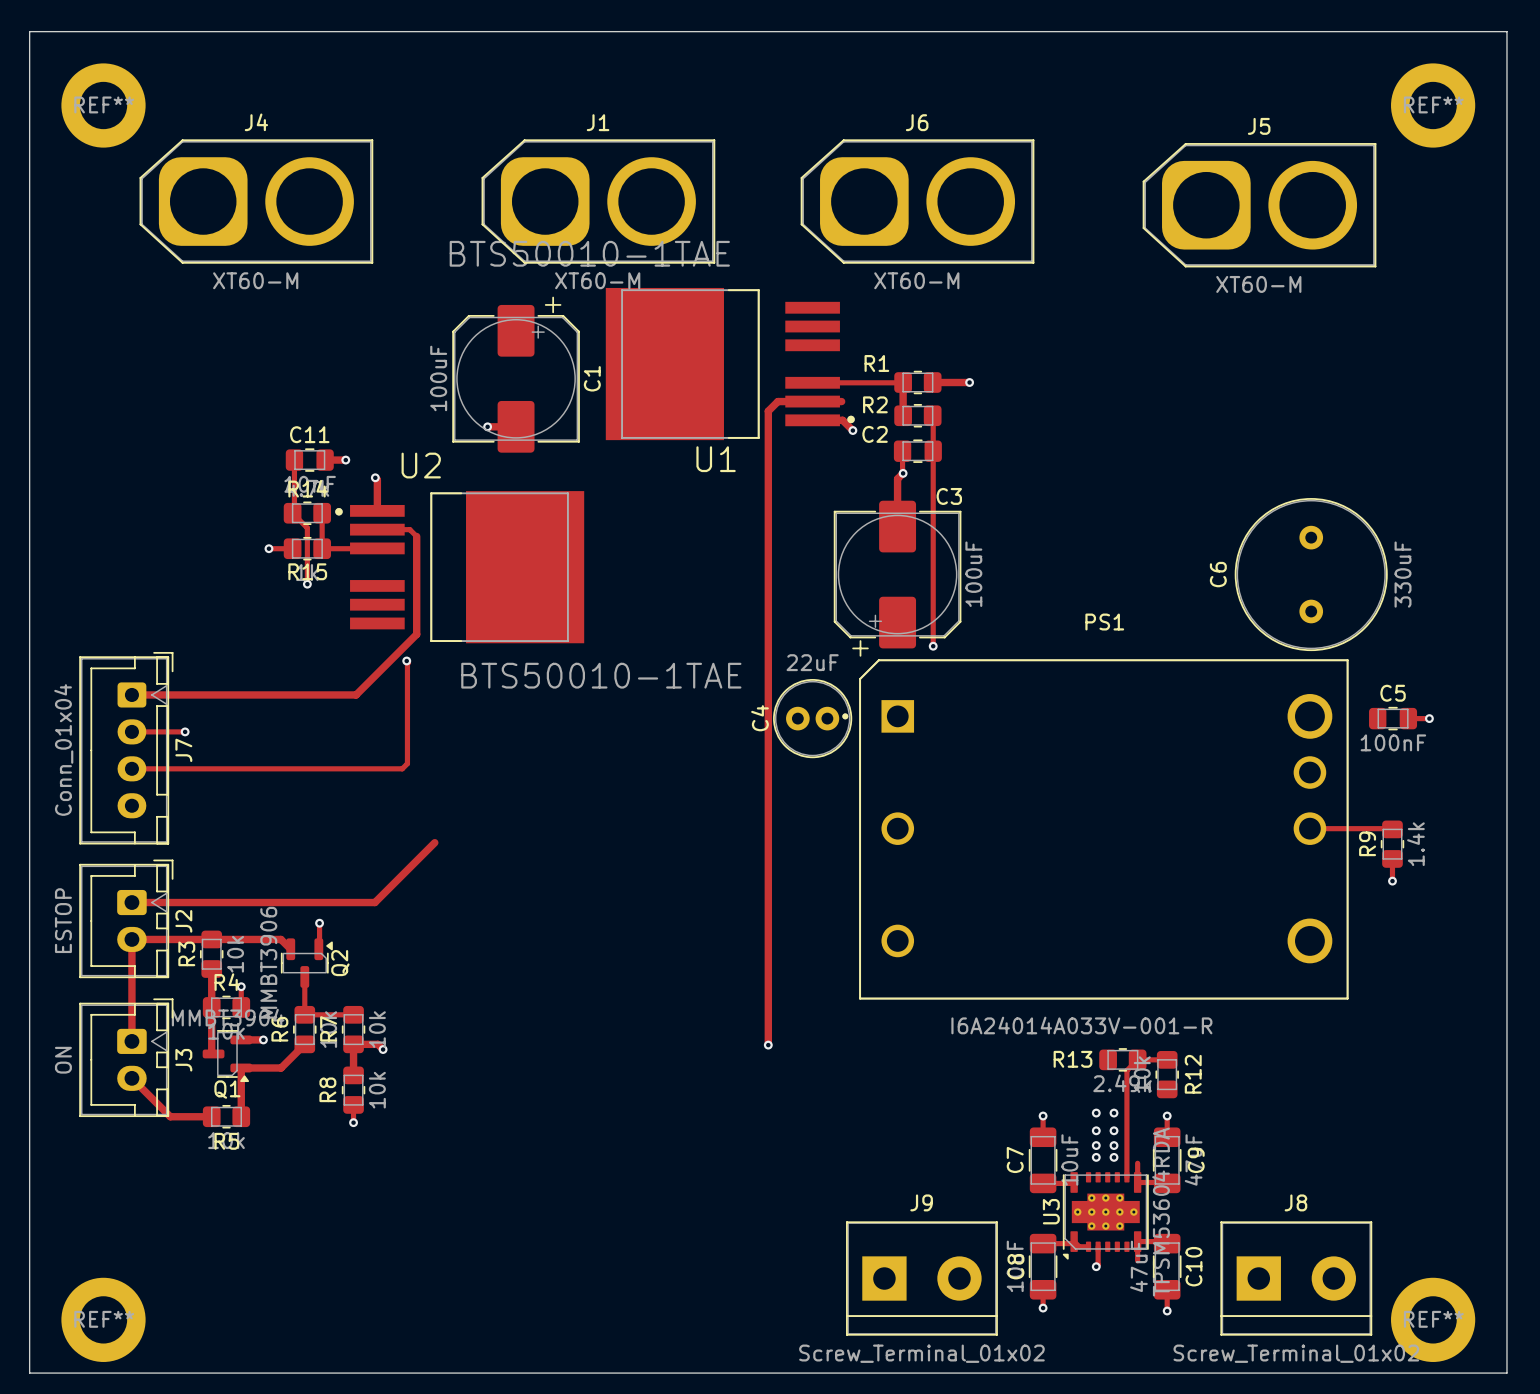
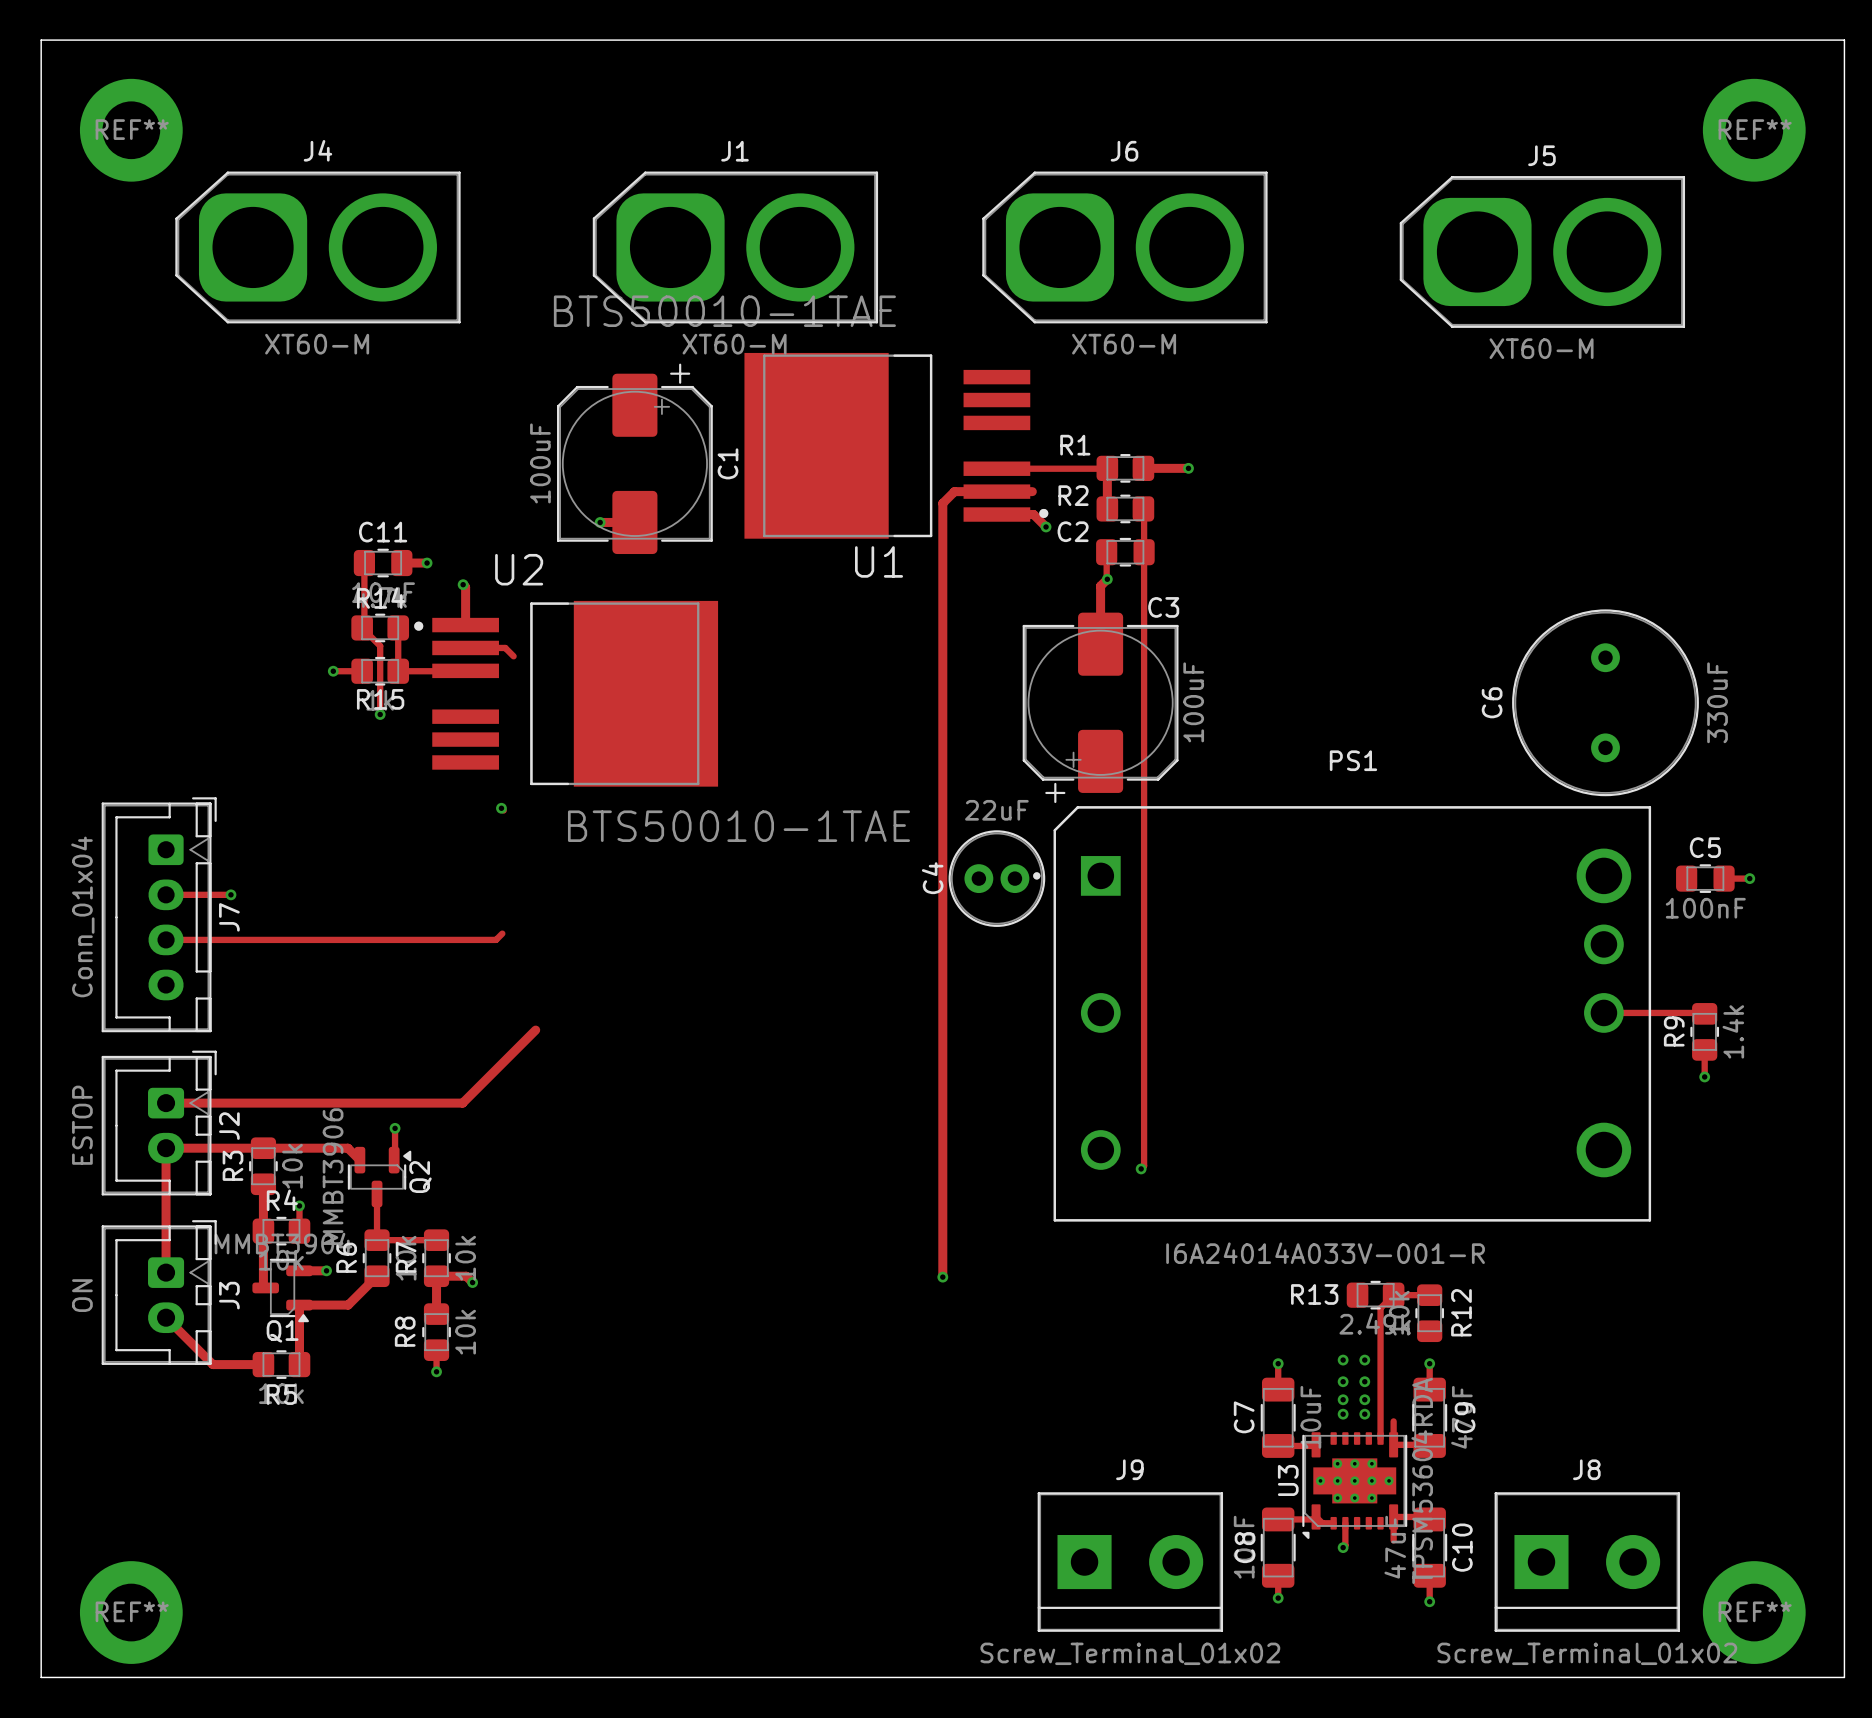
track: (416, 536) (416, 634) (356, 694) (131, 694) -> none
track: none -> (1144, 790) (1144, 1166) (1141, 1168)
via: (933, 646) -> none
track: (407, 661) (407, 763) -> none
via: none -> (1141, 1168)

